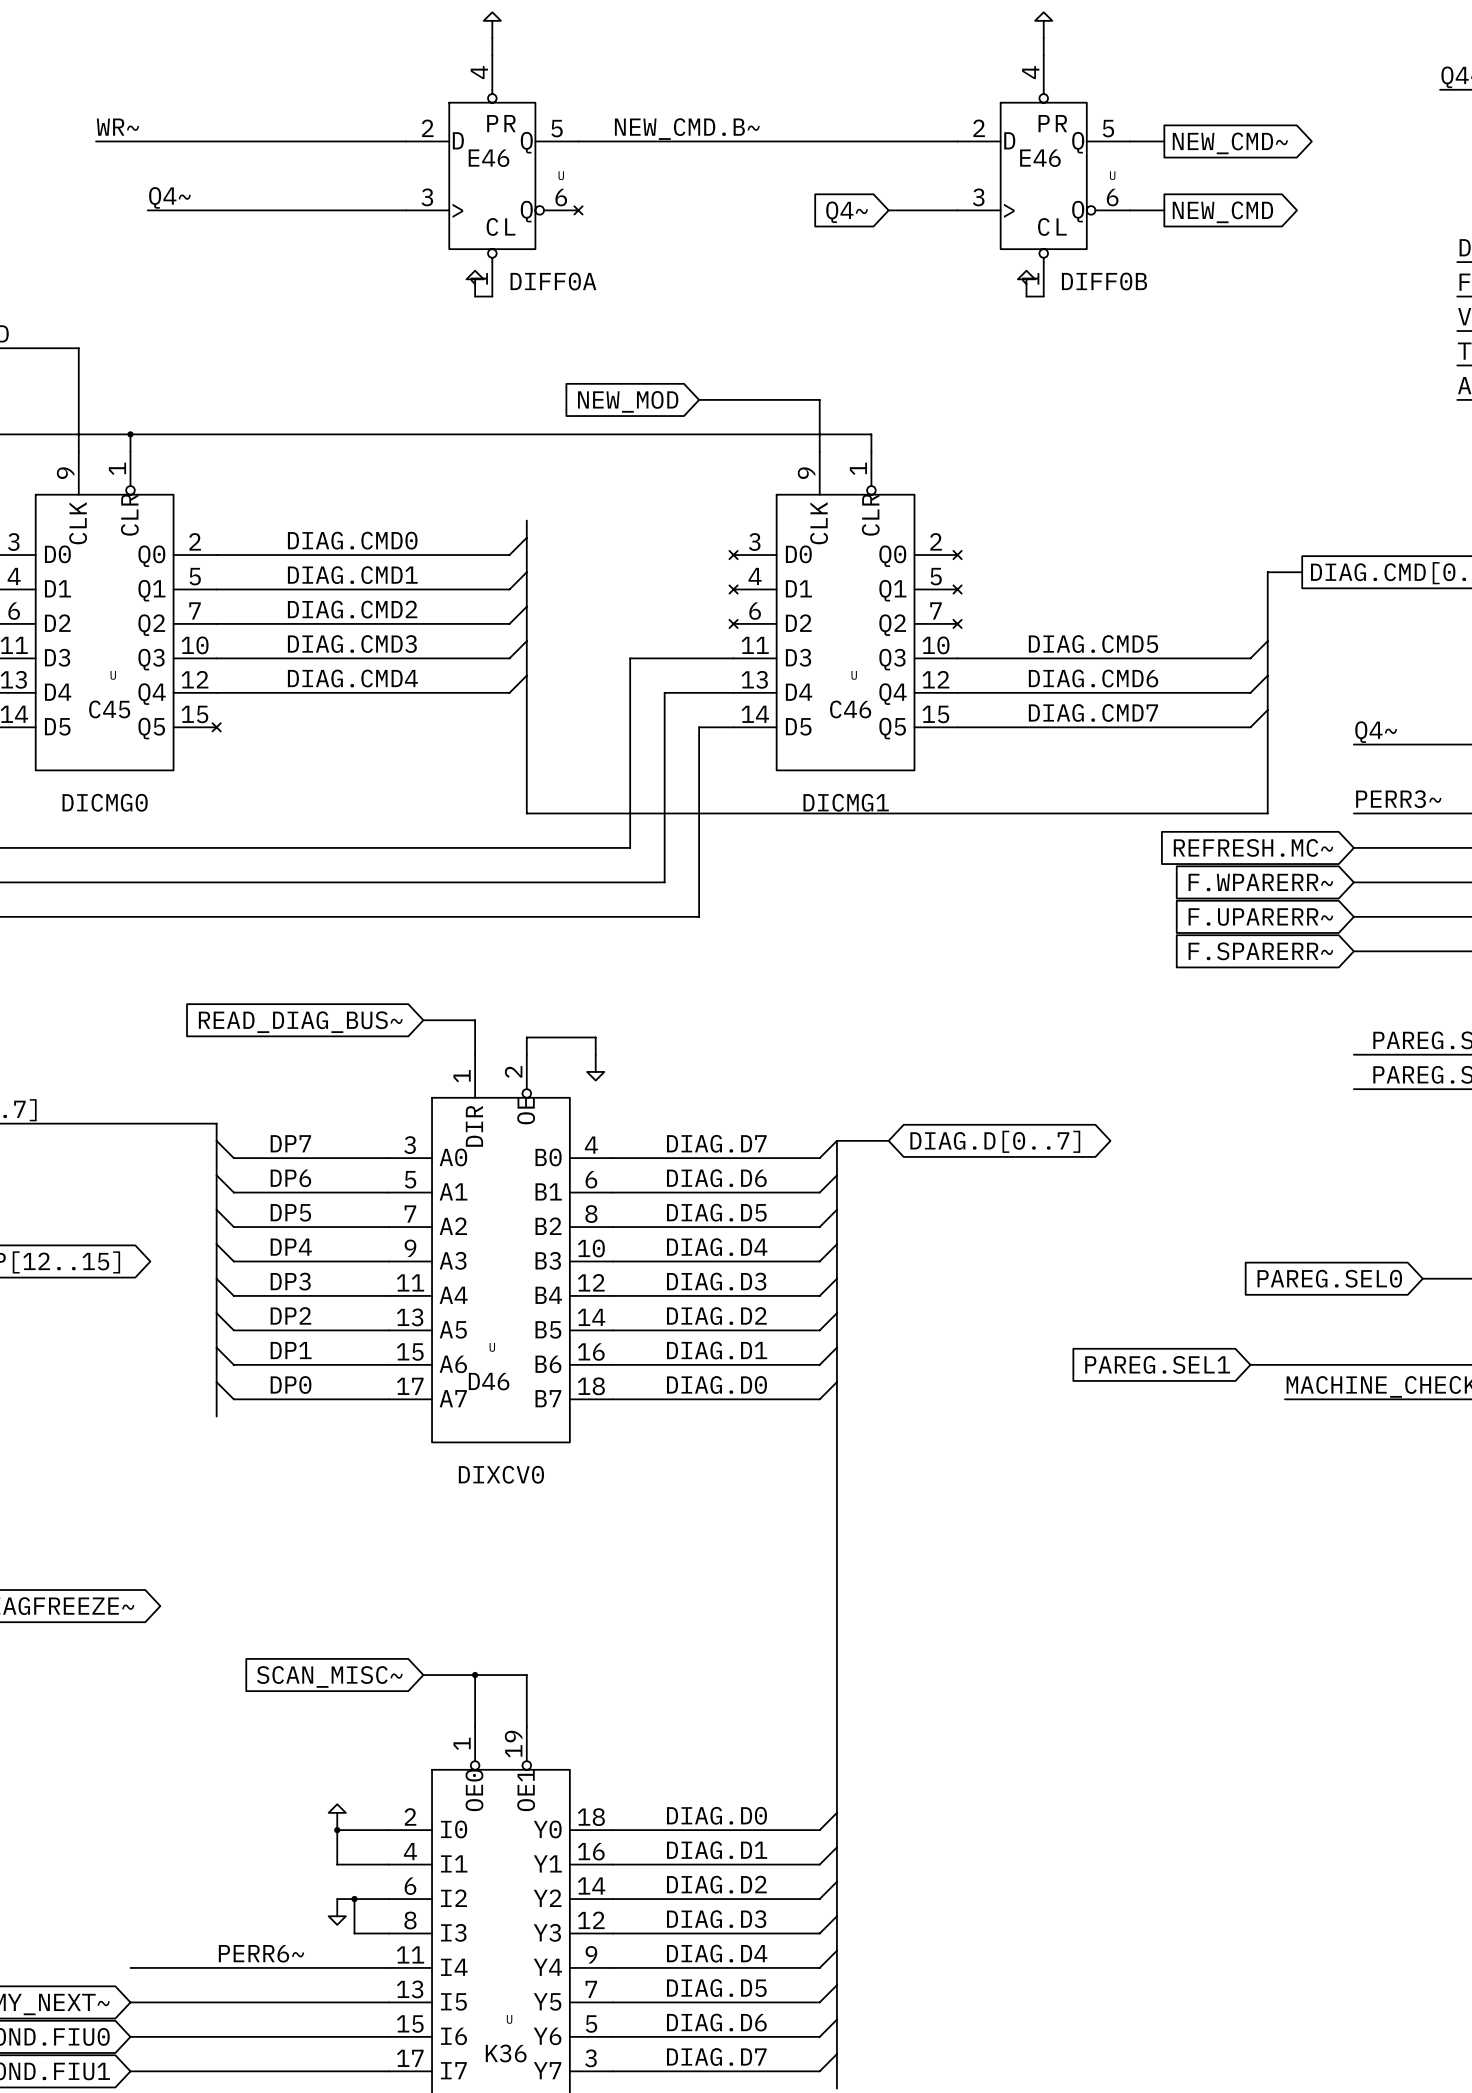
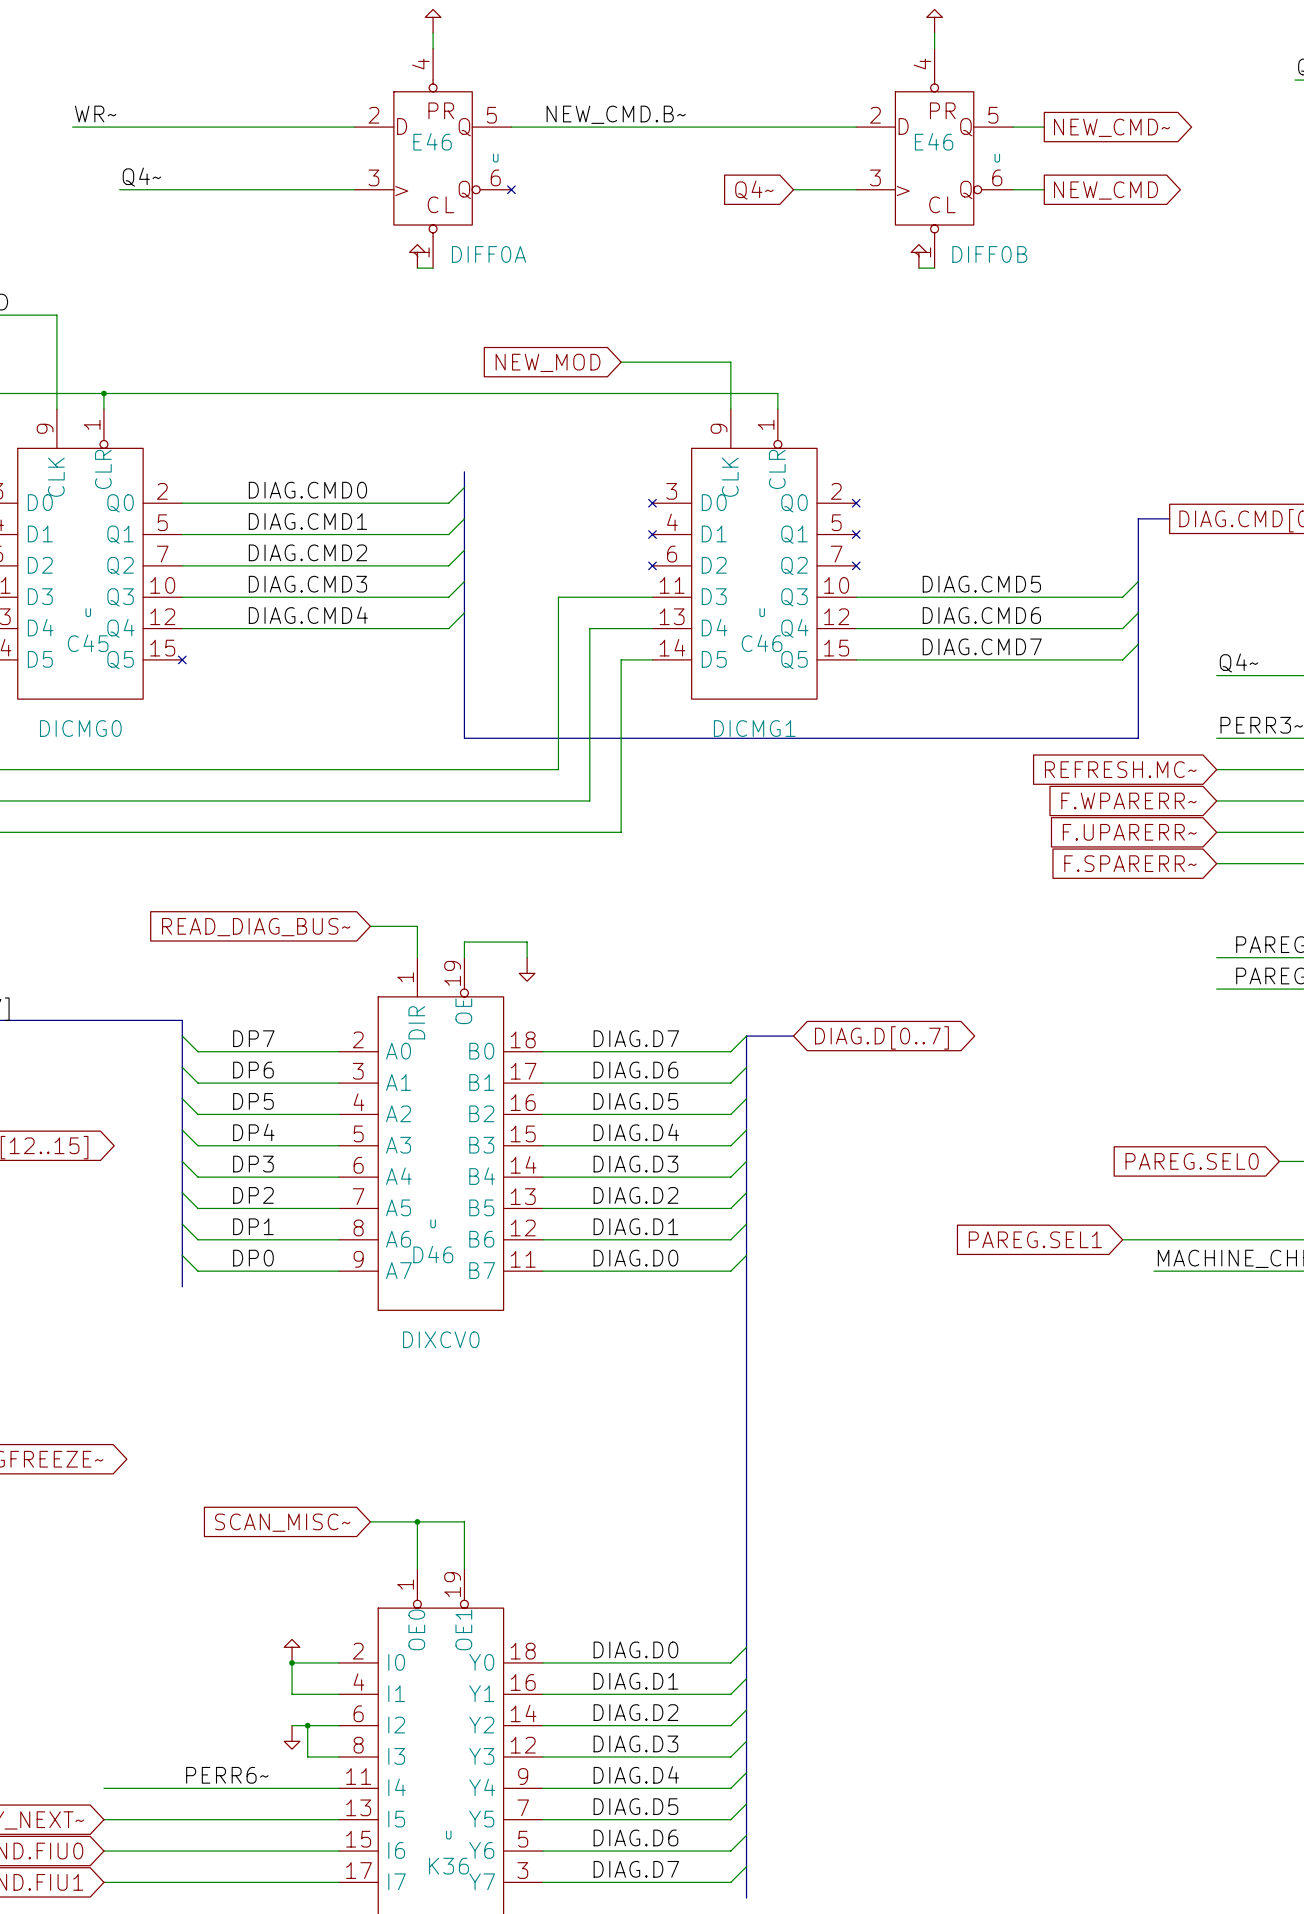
U symbol: [388, 1054, 613, 1443] -> [339, 957, 543, 1311]

